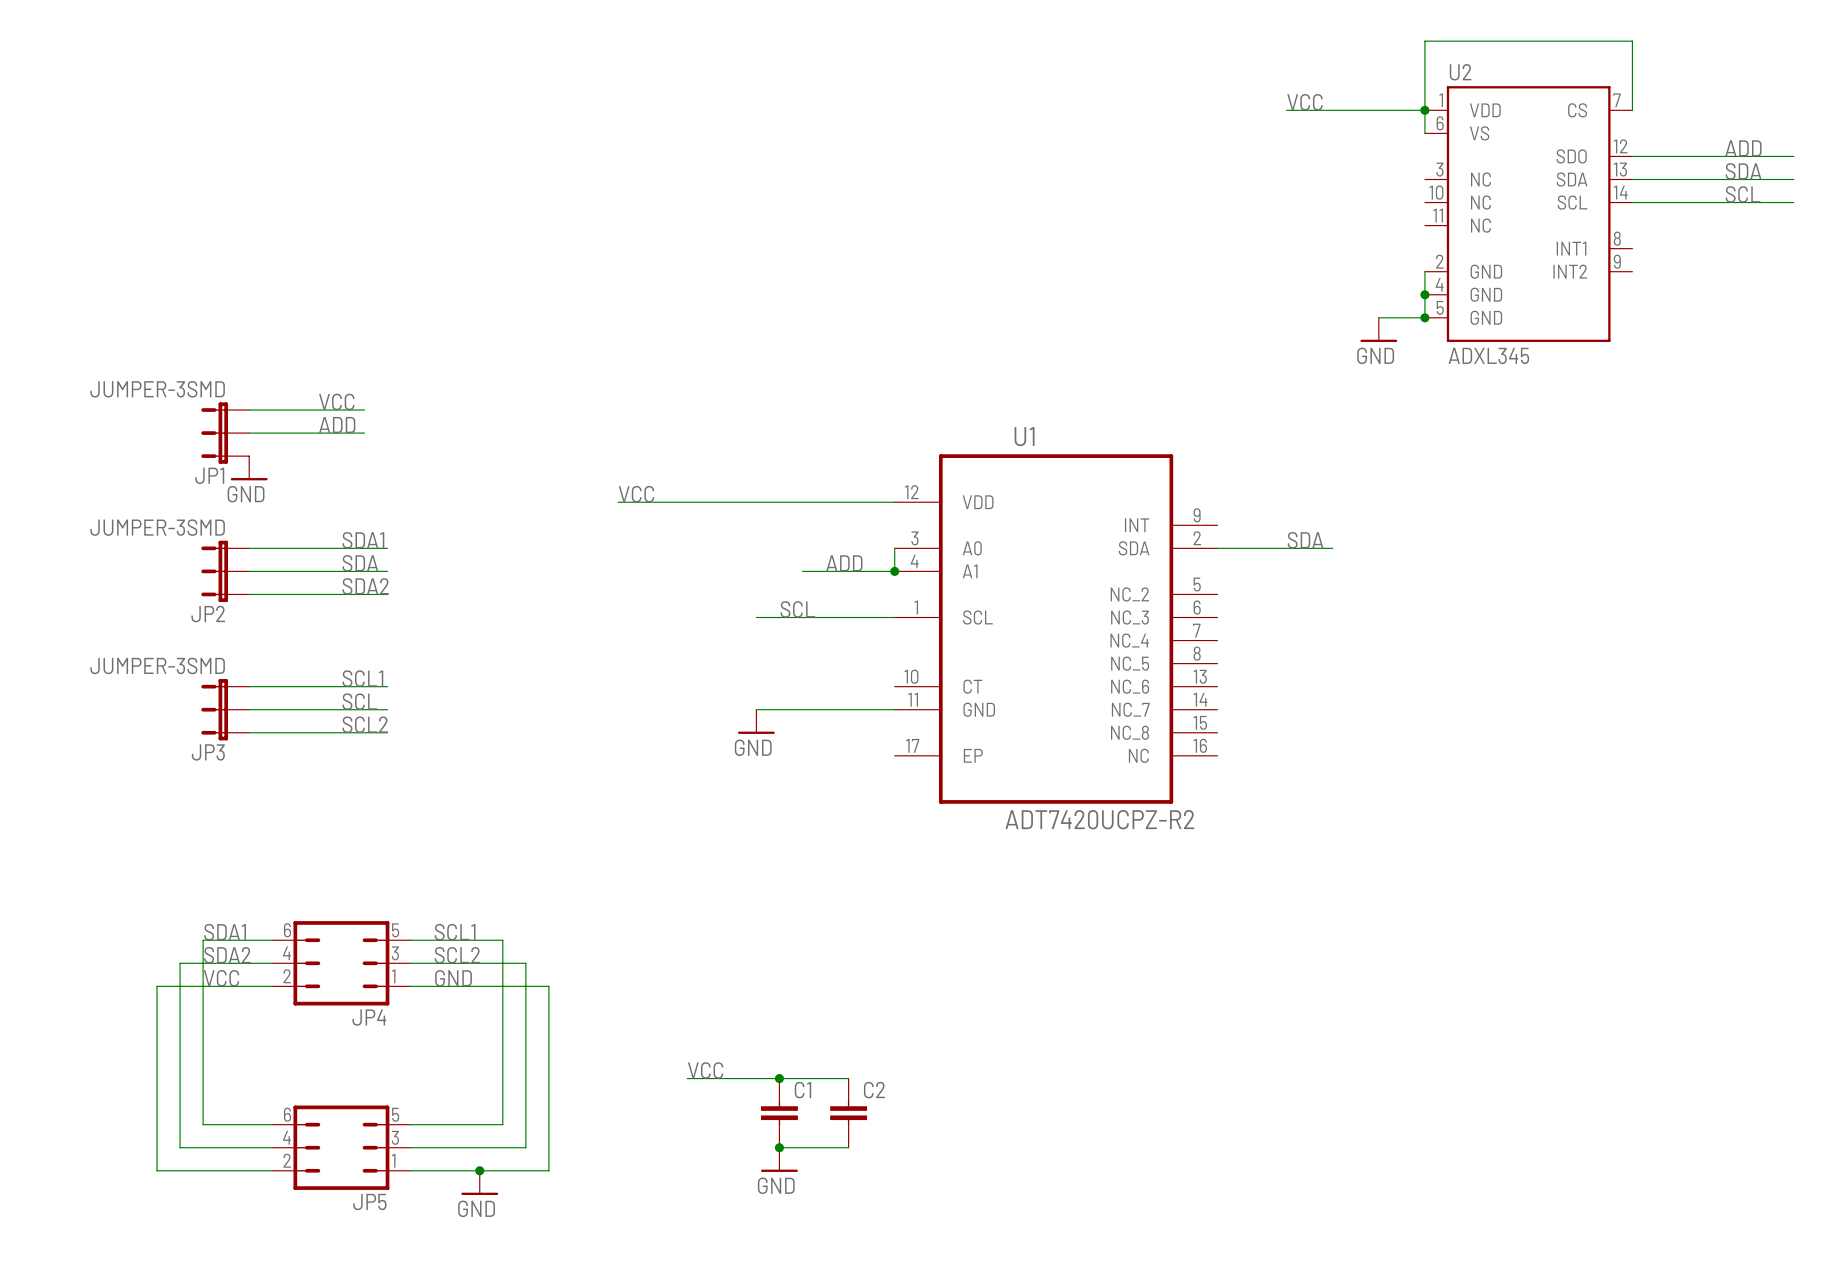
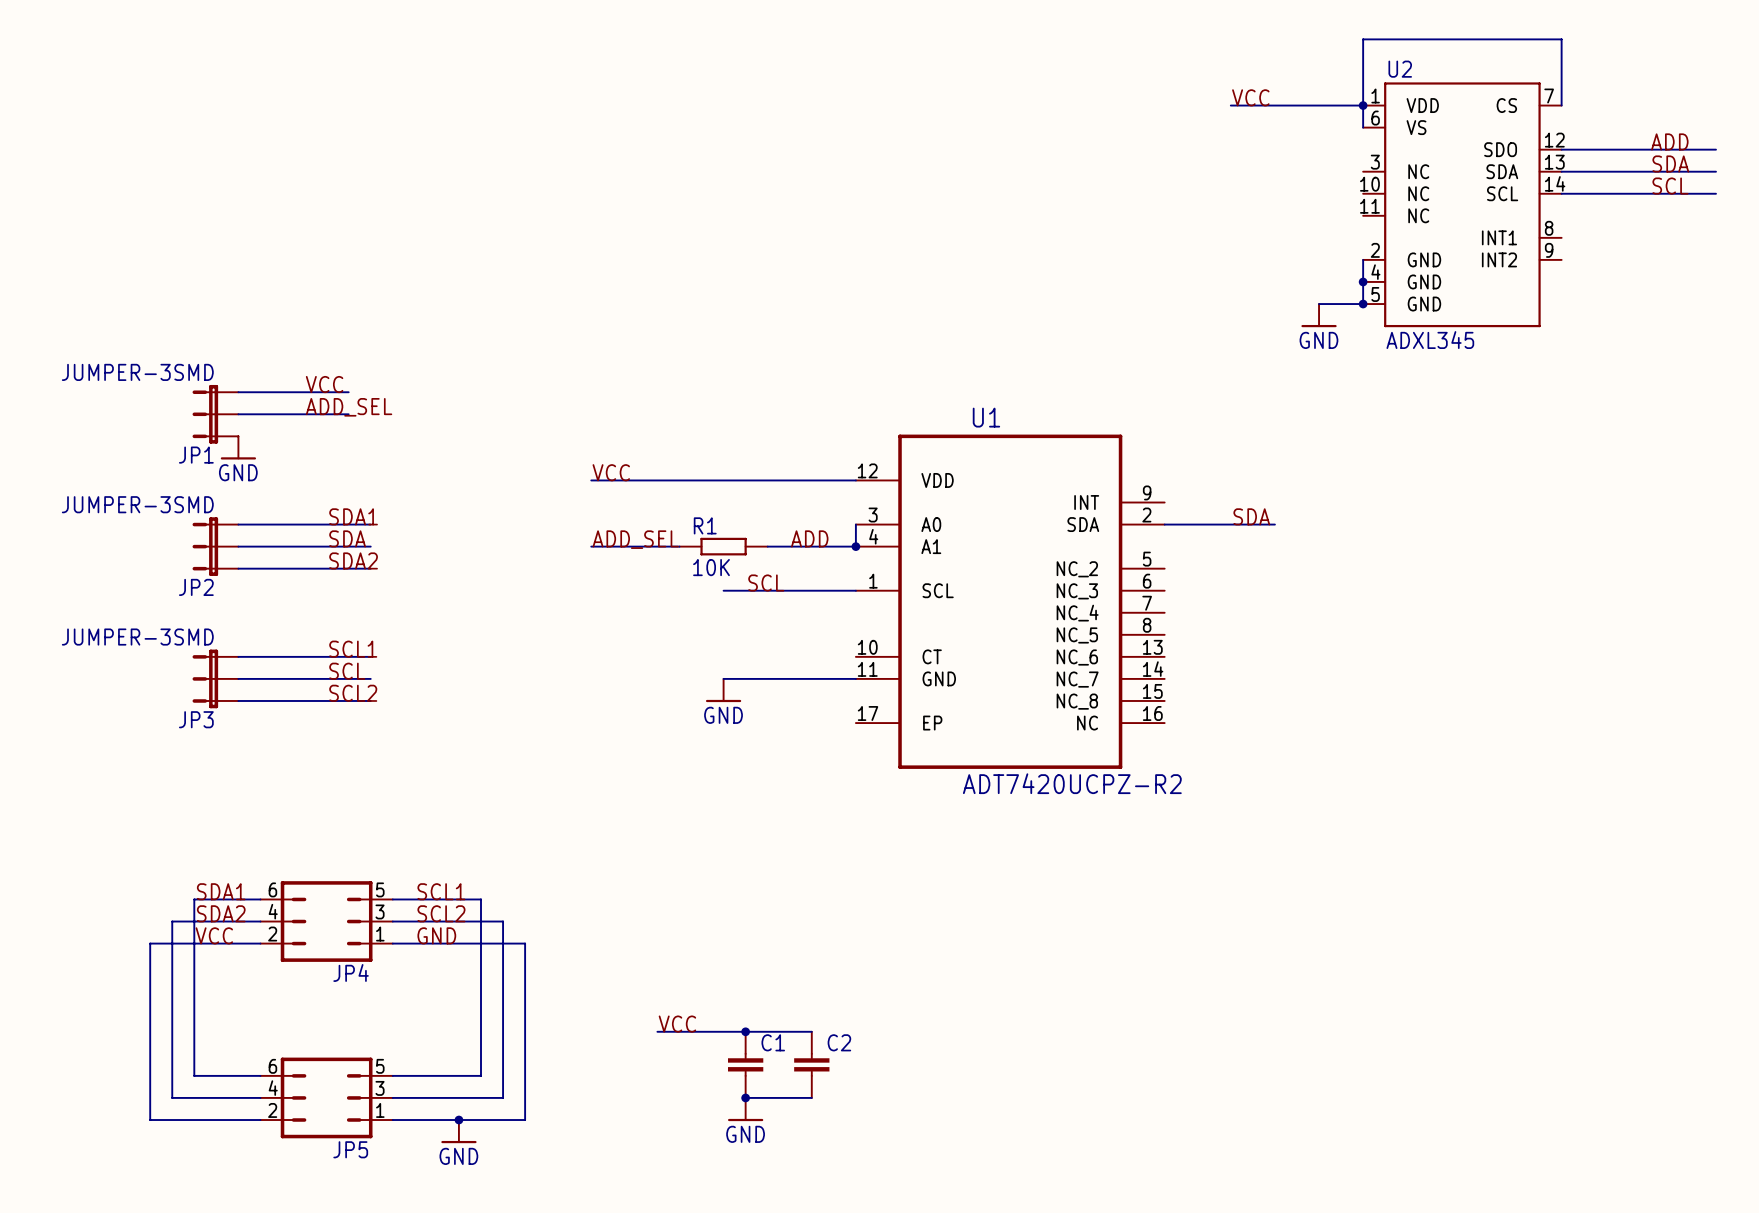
label: ADD (337, 425) -> ADD_SEL (349, 407)
label: none -> ADD_SEL (635, 539)
wire: none -> (591, 546) (679, 546)
R1: none -> 10K (723, 546)

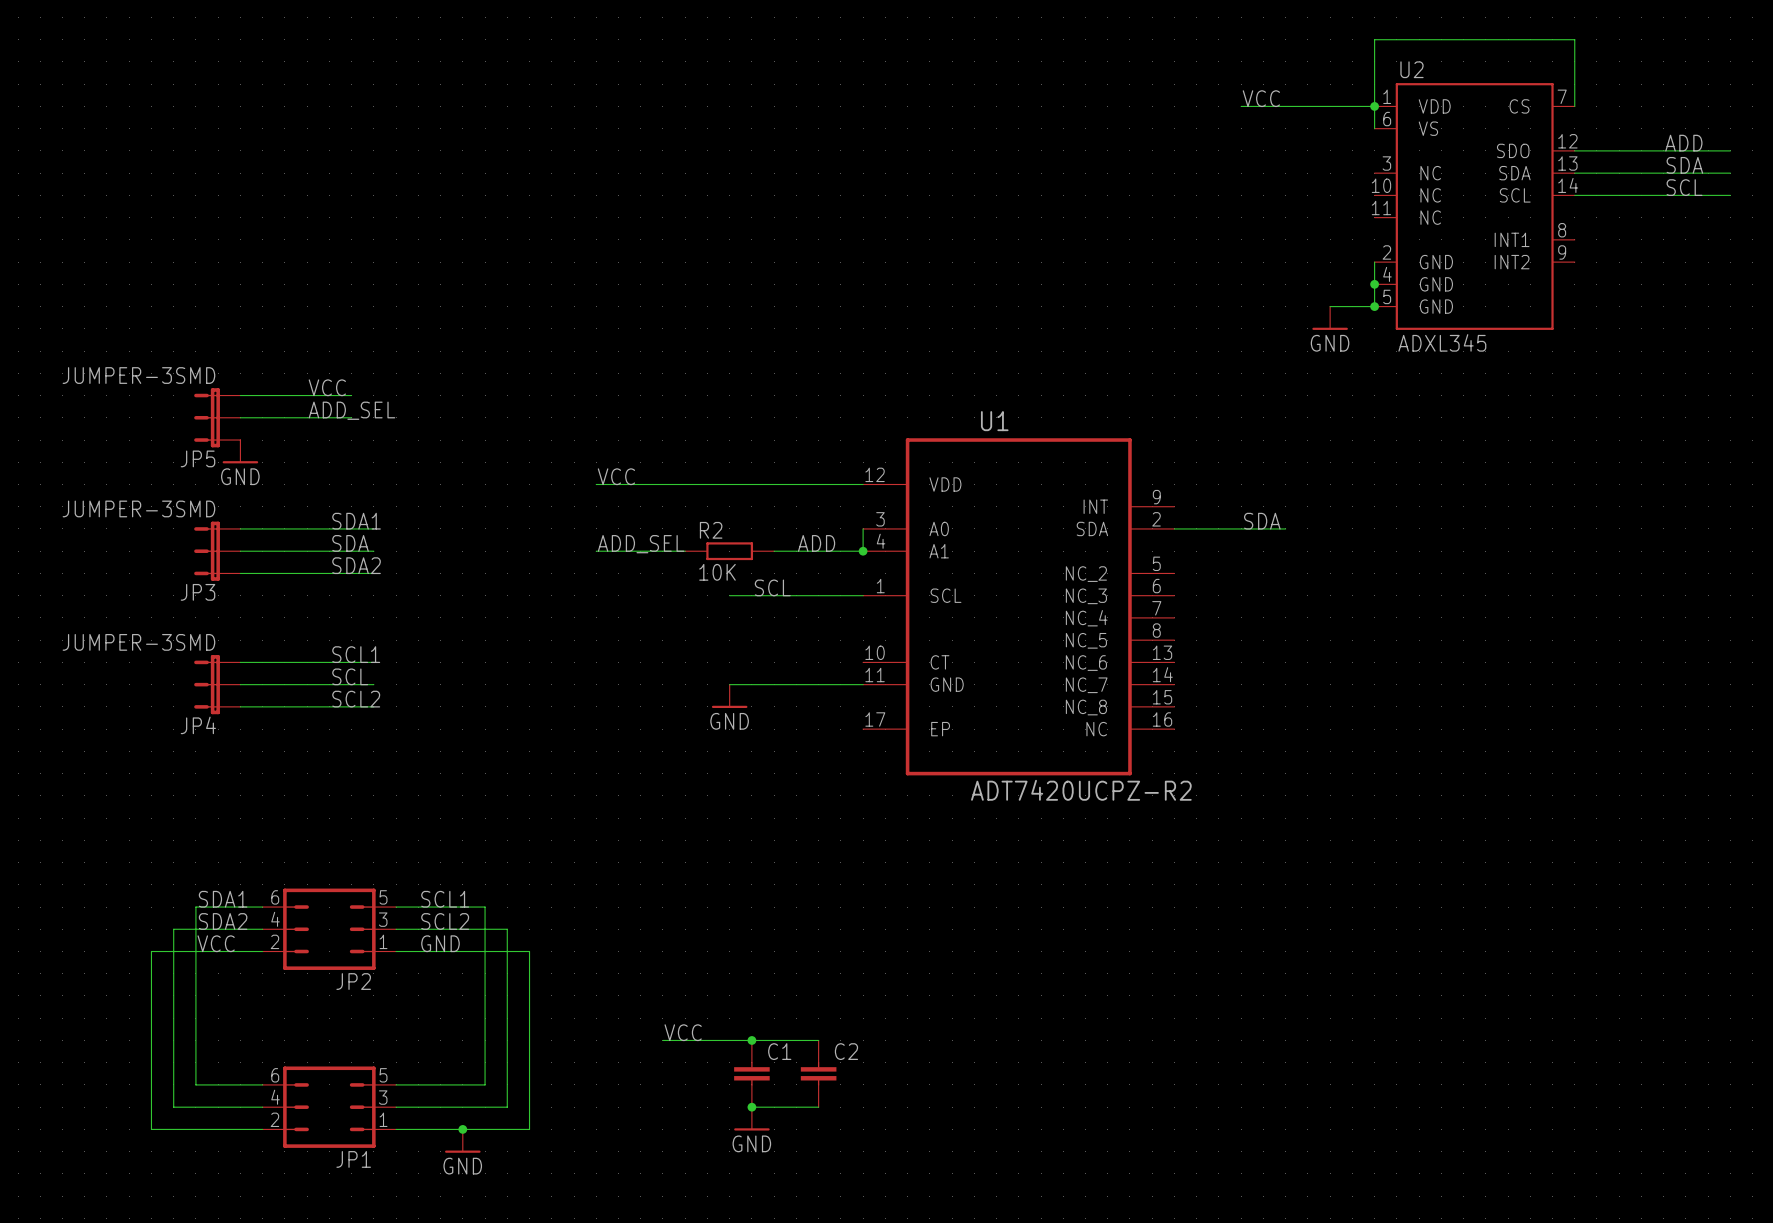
JP1 name: JP1 (196, 455) -> JP5 (198, 458)
R1 name: R1 (705, 525) -> R2 (711, 530)
JP2 name: JP2 (196, 587) -> JP3 (198, 592)
JP3 name: JP3 (196, 719) -> JP4 (198, 725)
JP4 name: JP4 (351, 972) -> JP2 (353, 981)
JP5 name: JP5 (350, 1149) -> JP1 (353, 1159)

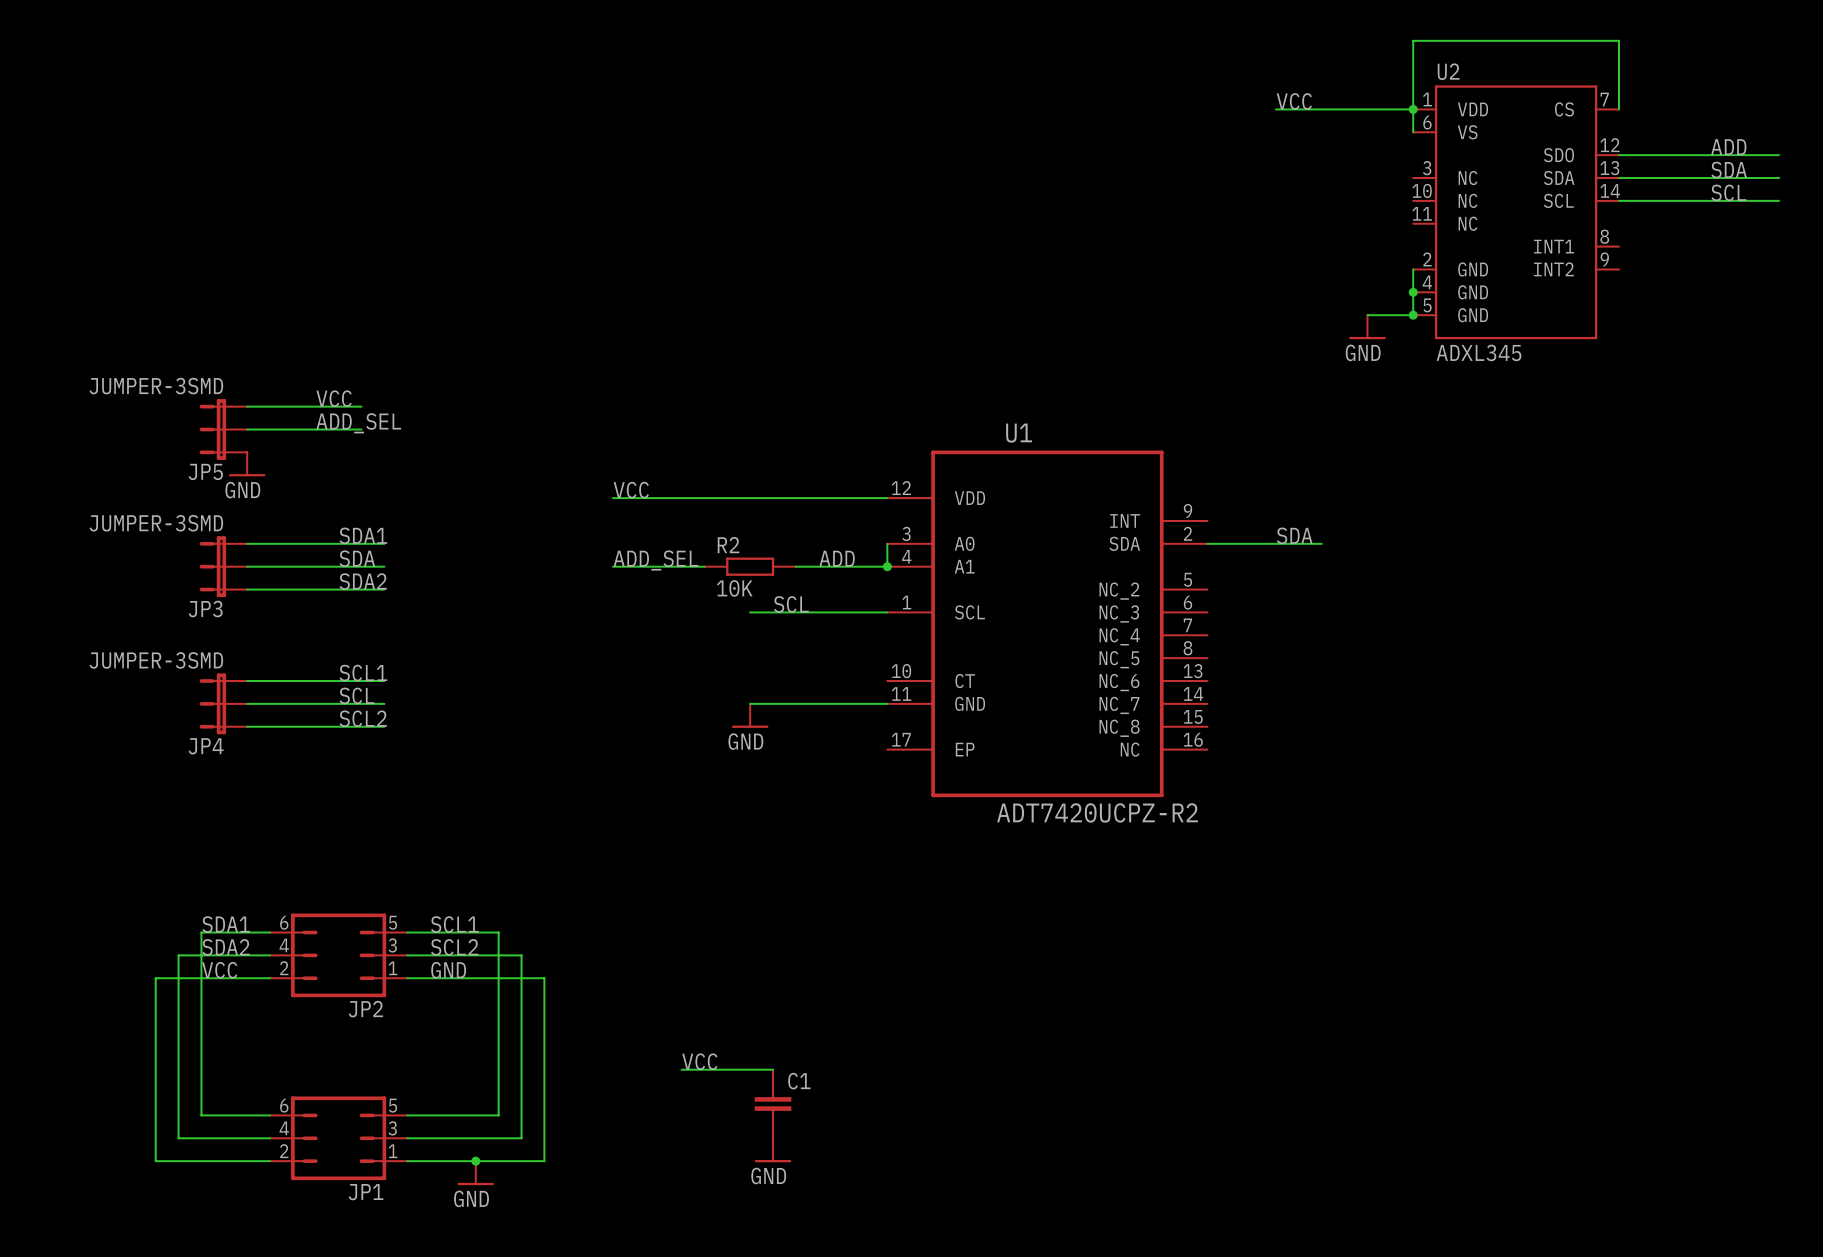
wire: (751, 1040) (818, 1040) -> none
junction: (751, 1040) -> none
C2: (818, 1073) -> none
wire: (751, 1107) (818, 1107) -> none
junction: (751, 1107) -> none

